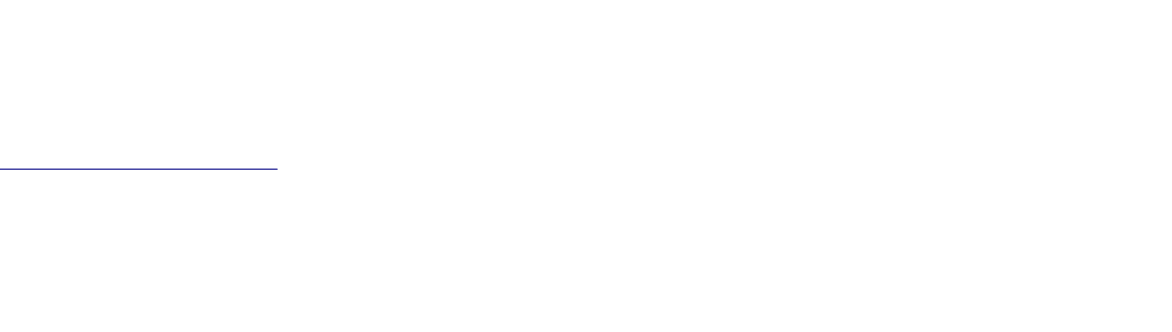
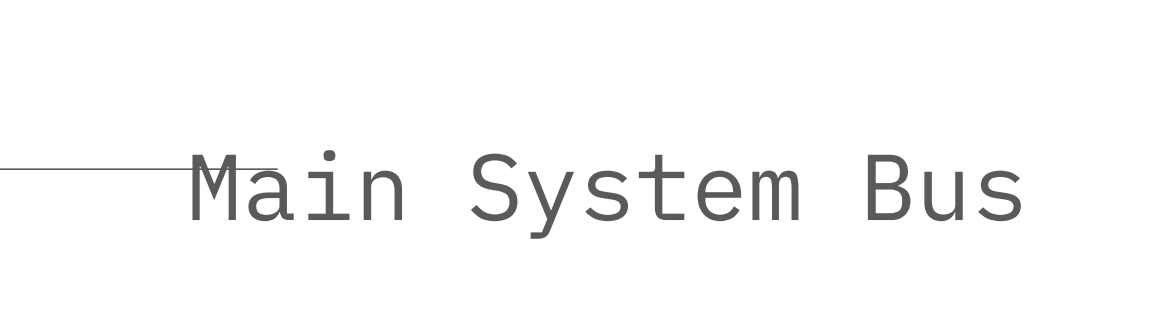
text: none -> Main System Bus (606, 194)

